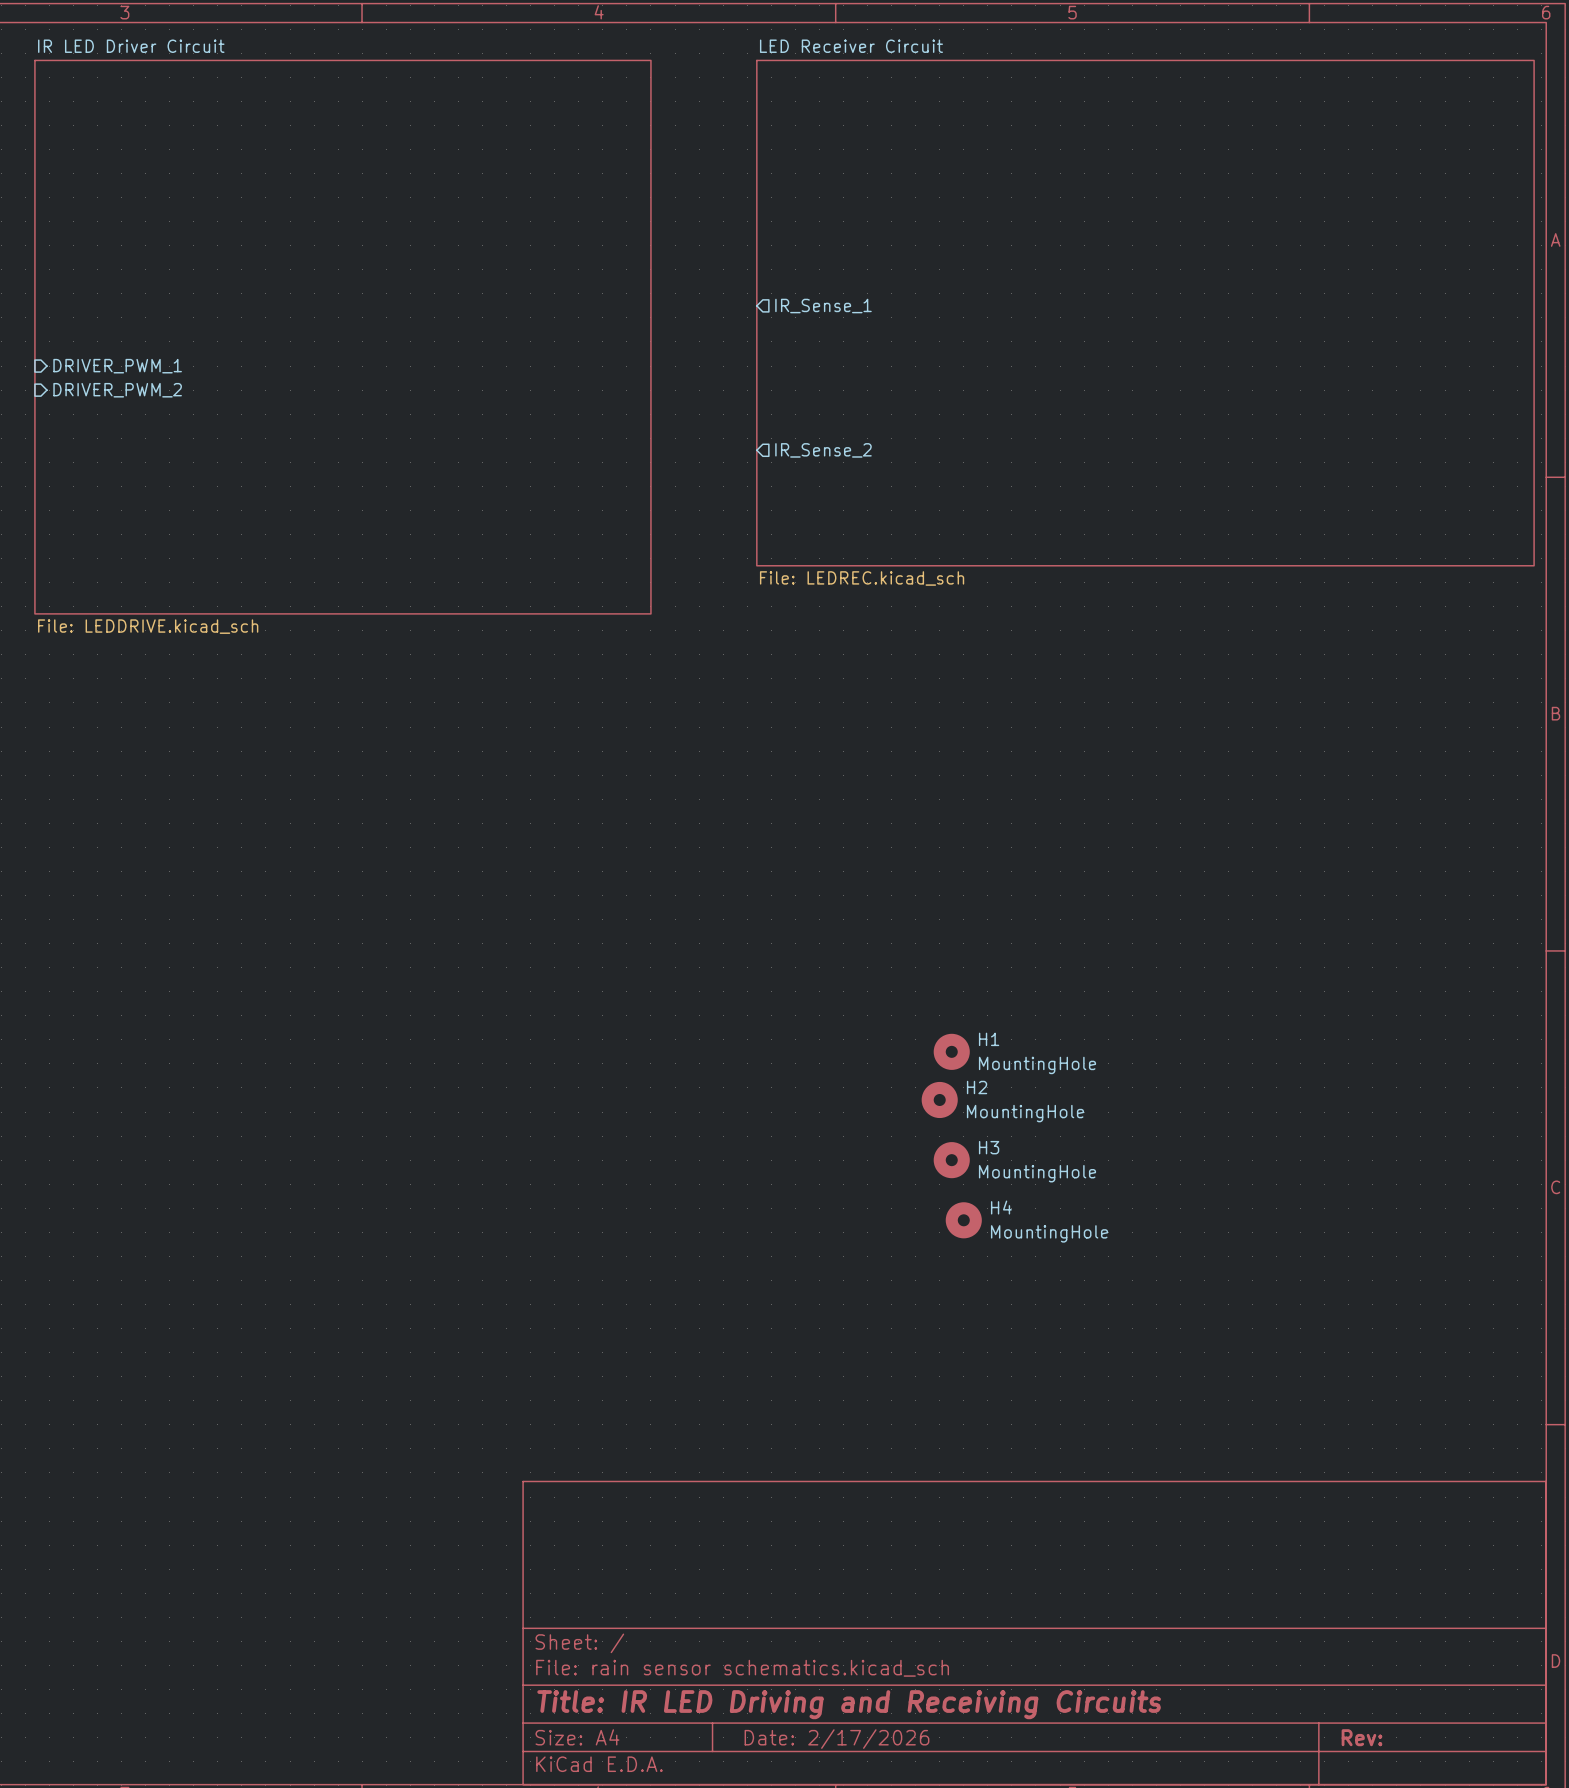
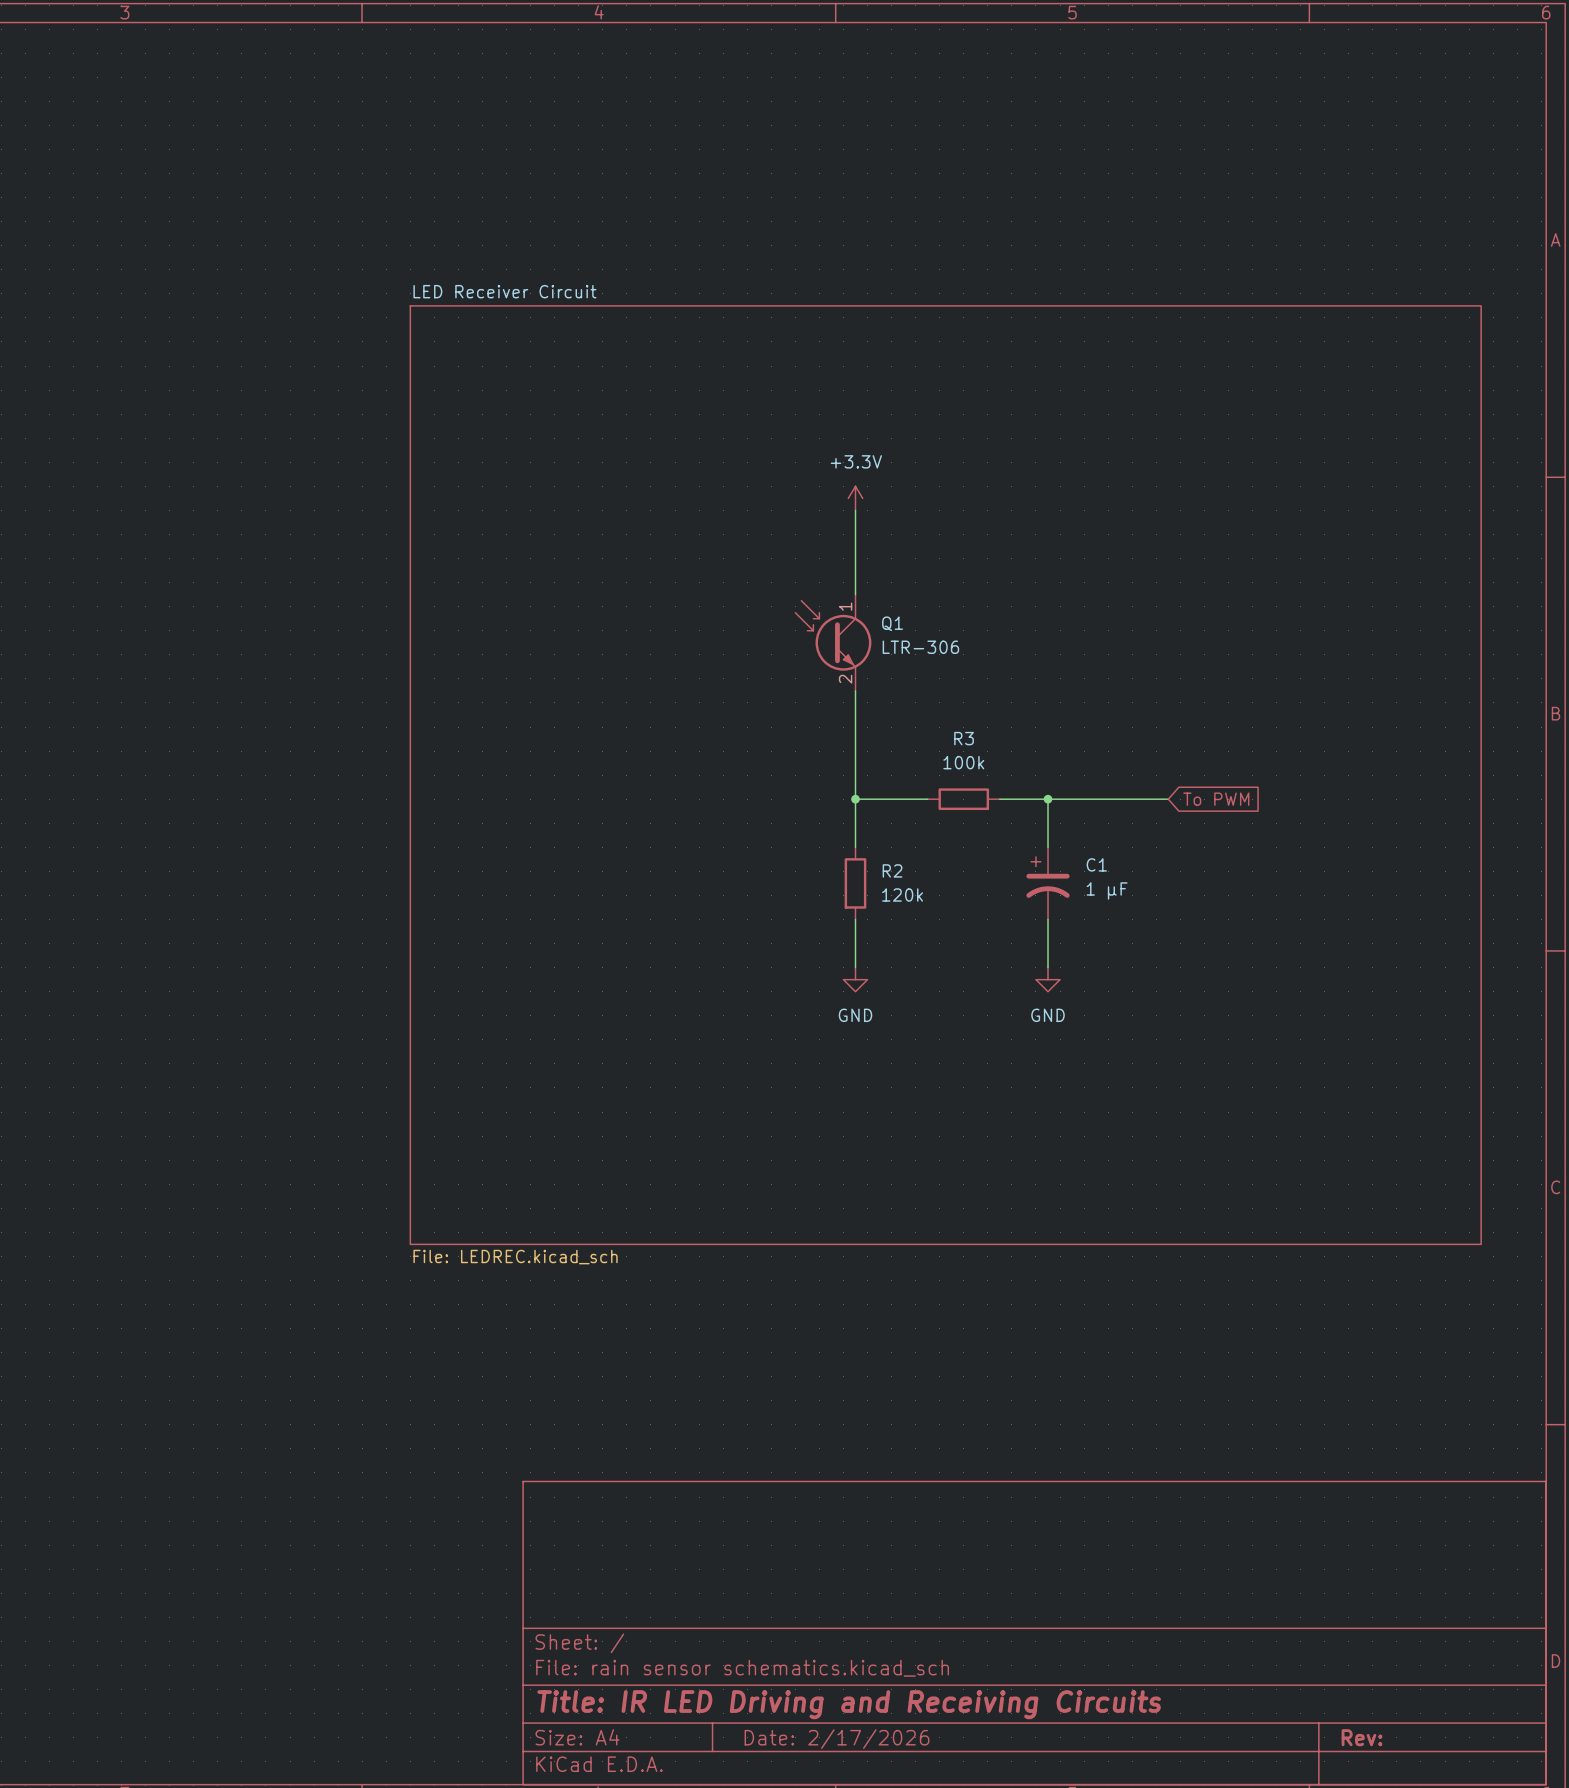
sheet pin: IR_Sense_1 (823, 306) -> none
sheet LED Receiver Circuit: File: LEDREC.kicad_sch (1145, 313) -> none
sheet IR LED Driver Circuit: File: LEDDRIVE.kicad_sch (342, 337) -> none
sheet pin: DRIVER_PWM_1 (117, 366) -> none
sheet pin: DRIVER_PWM_2 (117, 390) -> none
sheet pin: IR_Sense_2 (823, 450) -> none
power symbol: none -> +3.3V (855, 498)
wire: none -> (855, 510) (855, 594)
Q1: none -> LTR-306 (833, 642)
wire: none -> (855, 690) (855, 847)
sheet LED Receiver Circuit: none -> File: LEDREC.kicad_sch (945, 775)
wire: none -> (855, 799) (927, 799)
junction: none -> (855, 799)
R3: none -> 100k (963, 799)
wire: none -> (999, 799) (1168, 799)
wire: none -> (1048, 799) (1048, 847)
junction: none -> (1048, 799)
global label: none -> To PWM (1216, 799)
R2: none -> 120k (855, 883)
C1: none -> 1 μF (1048, 883)
wire: none -> (855, 919) (855, 967)
wire: none -> (1048, 919) (1048, 967)
power symbol: none -> GND (855, 979)
power symbol: none -> GND (1048, 979)
H1: MountingHole (951, 1051) -> none
H2: MountingHole (939, 1099) -> none
H3: MountingHole (951, 1160) -> none
H4: MountingHole (963, 1220) -> none

